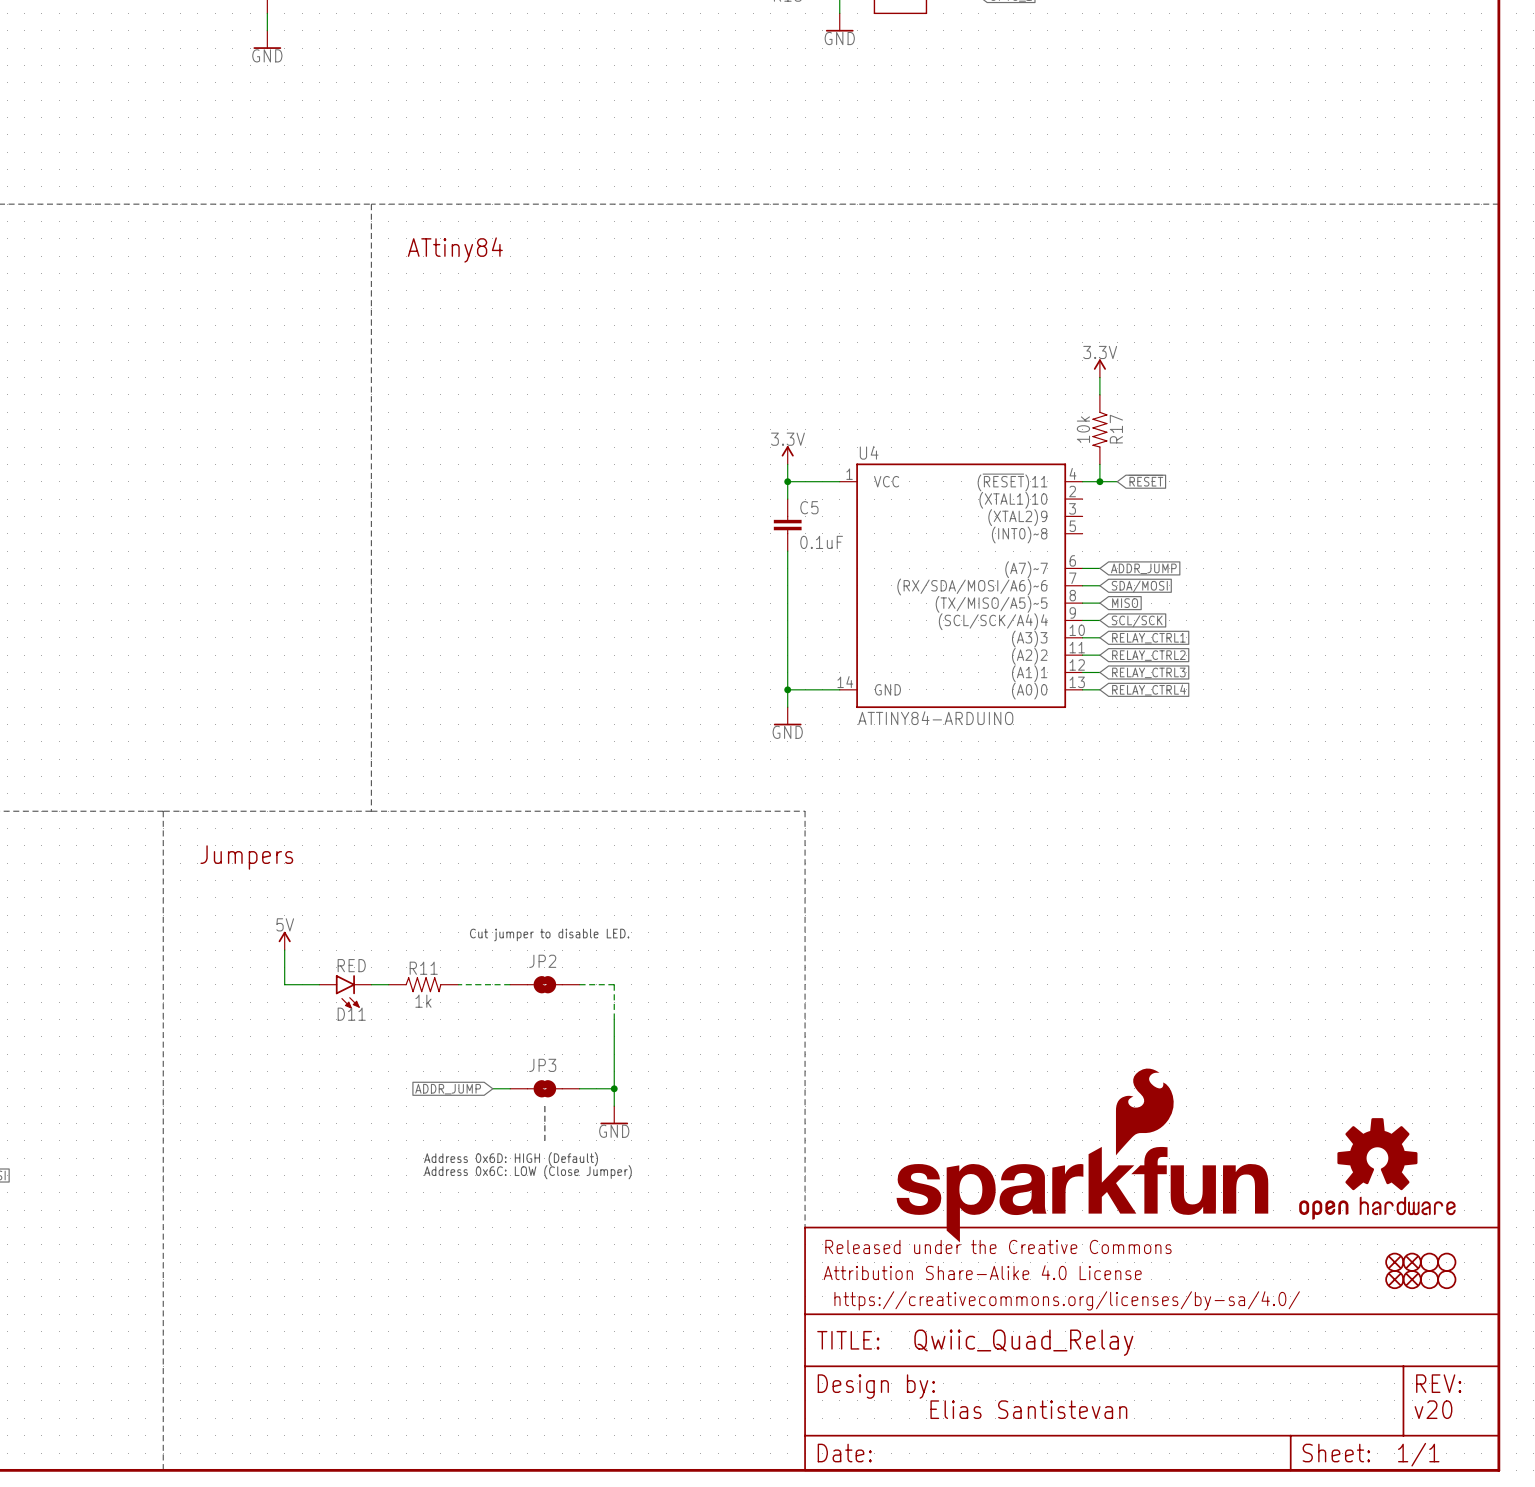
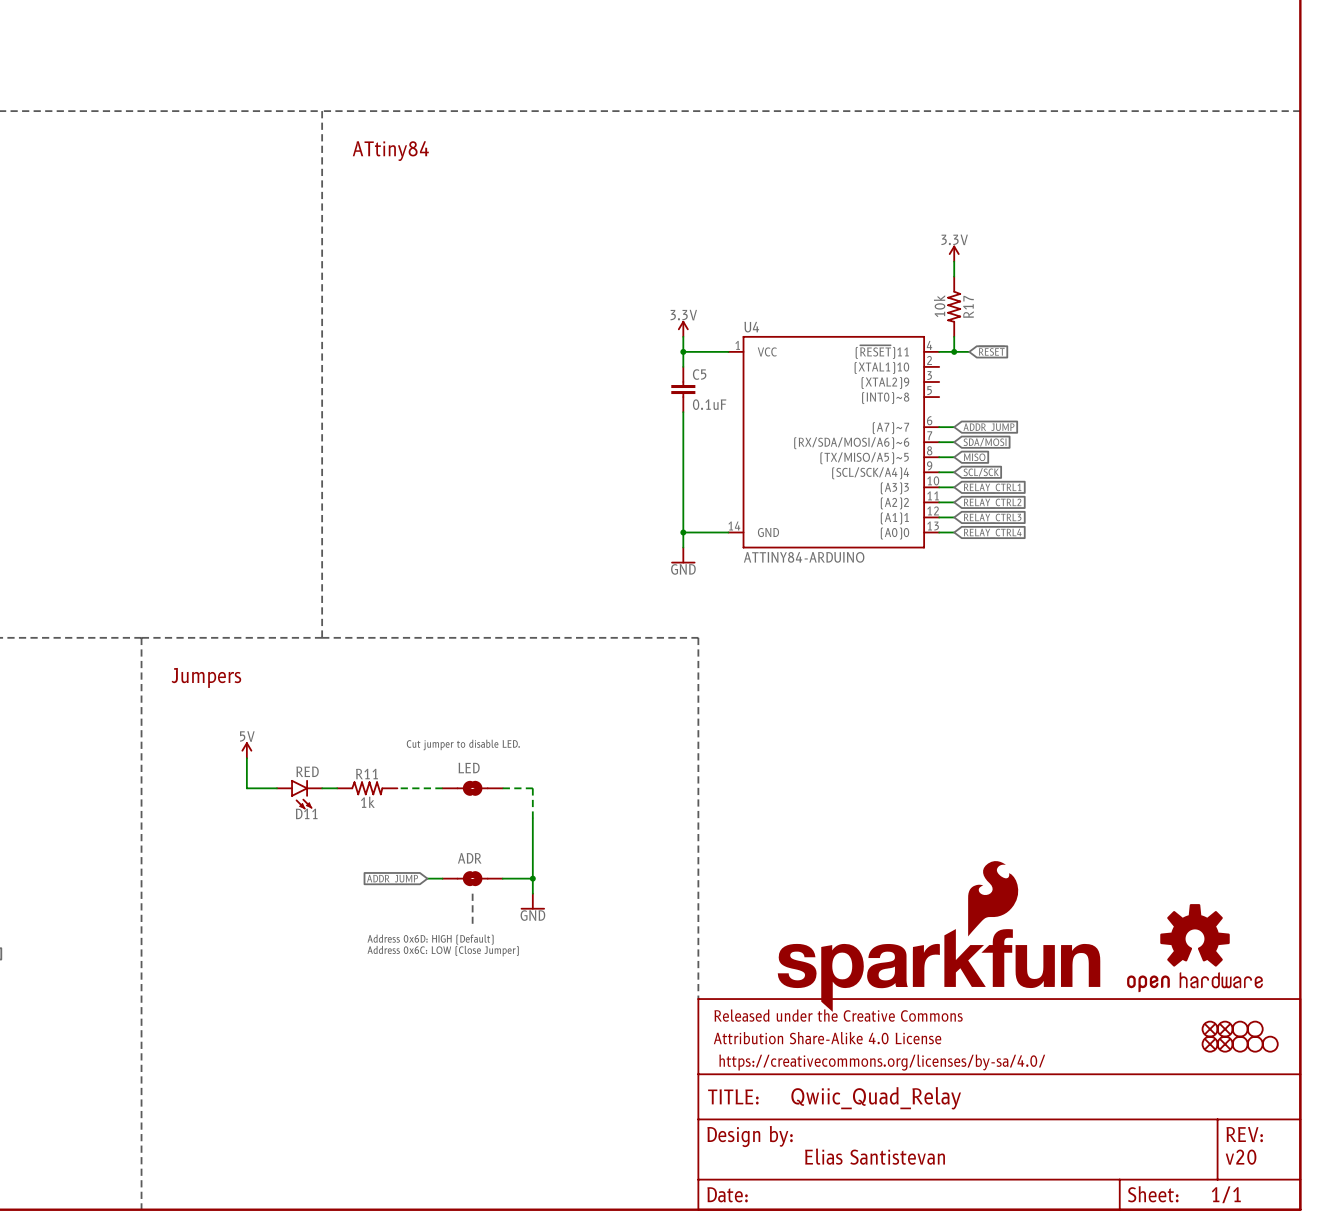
JP2 name: JP2 (542, 961) -> LED (469, 768)
JP3 name: JP3 (542, 1065) -> ADR (469, 858)
part: none -> (1270, 1044)

